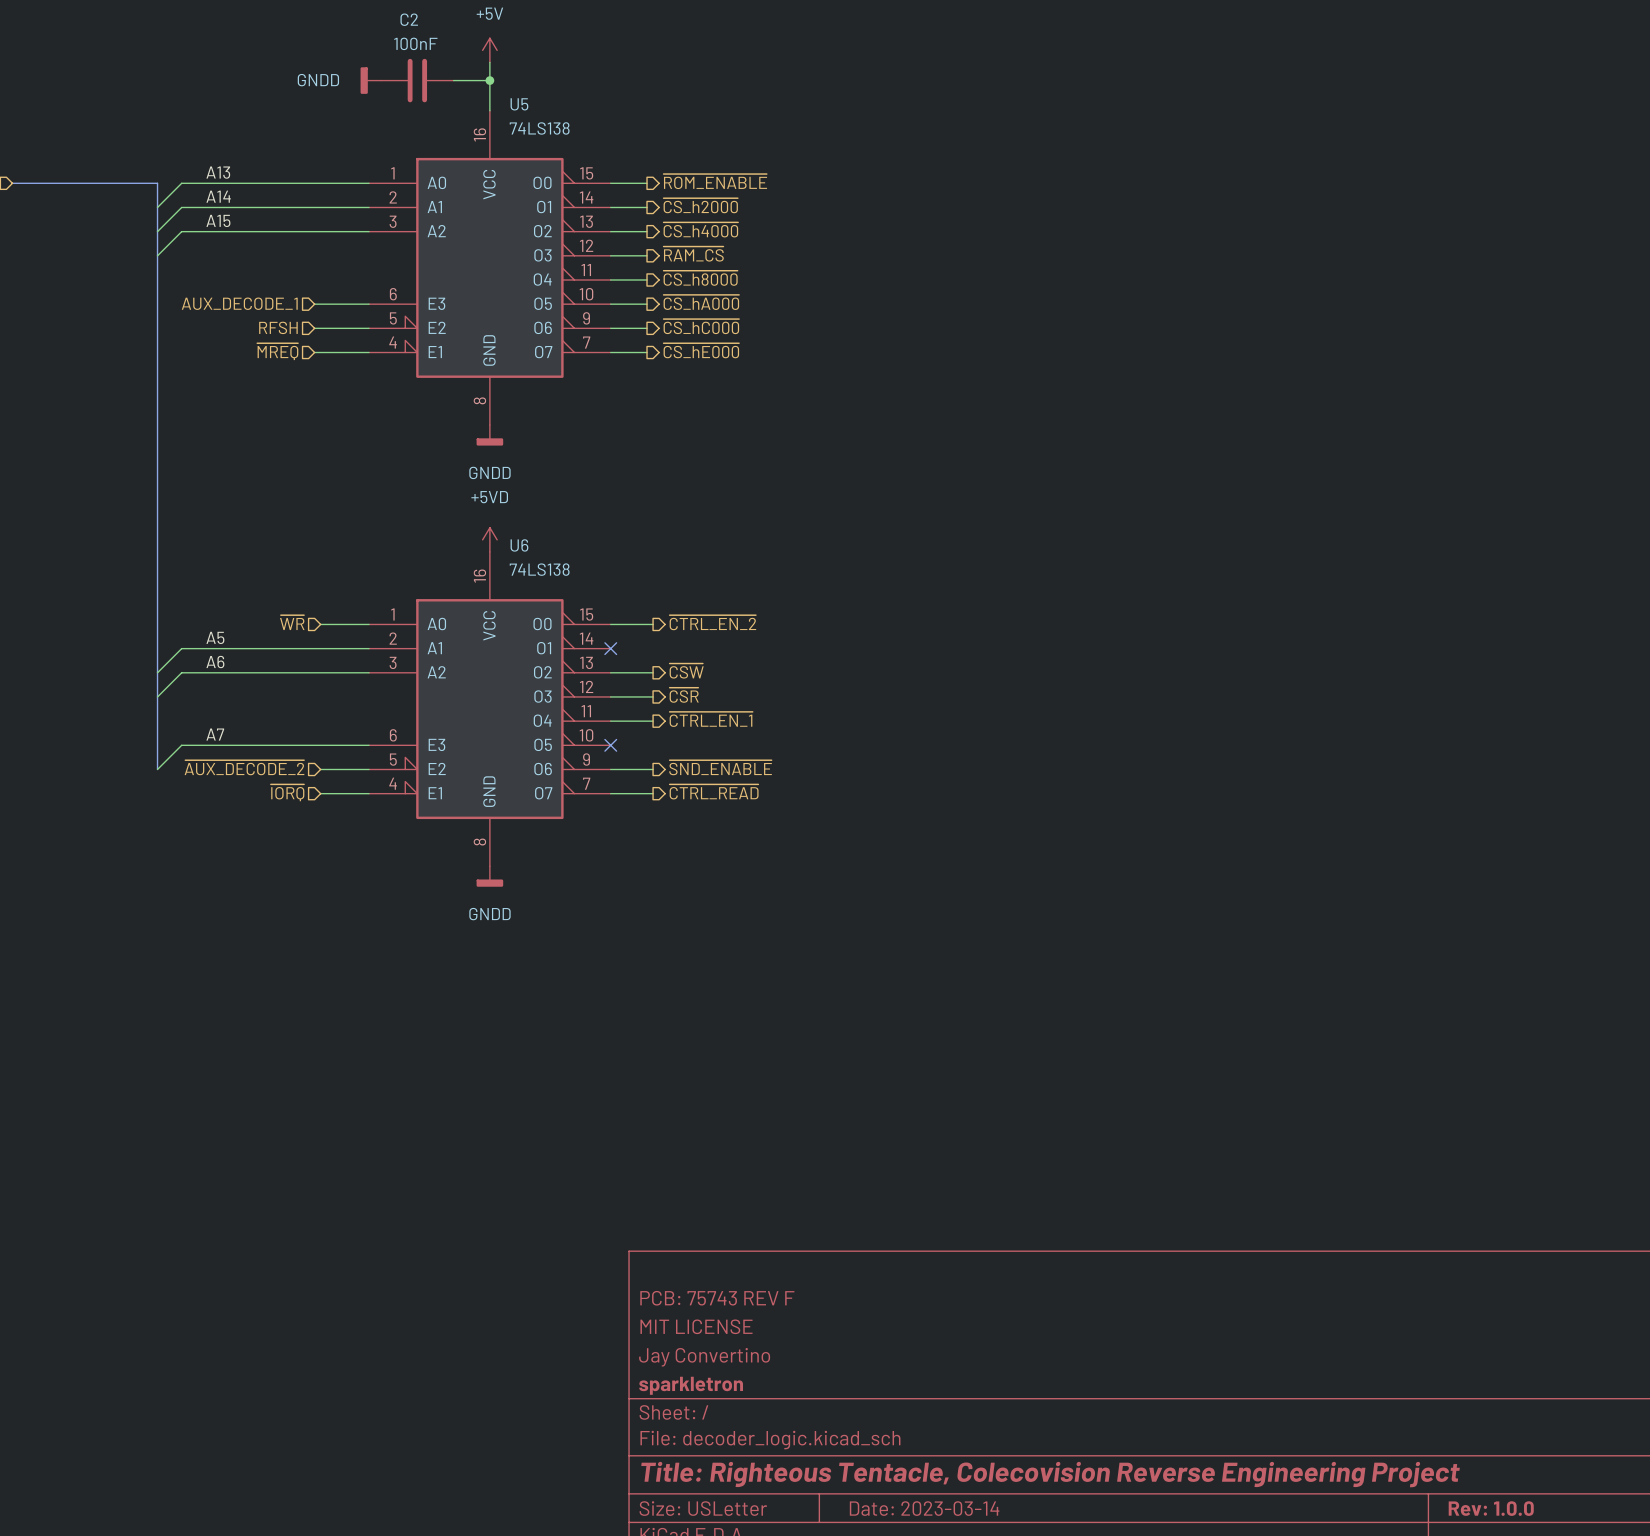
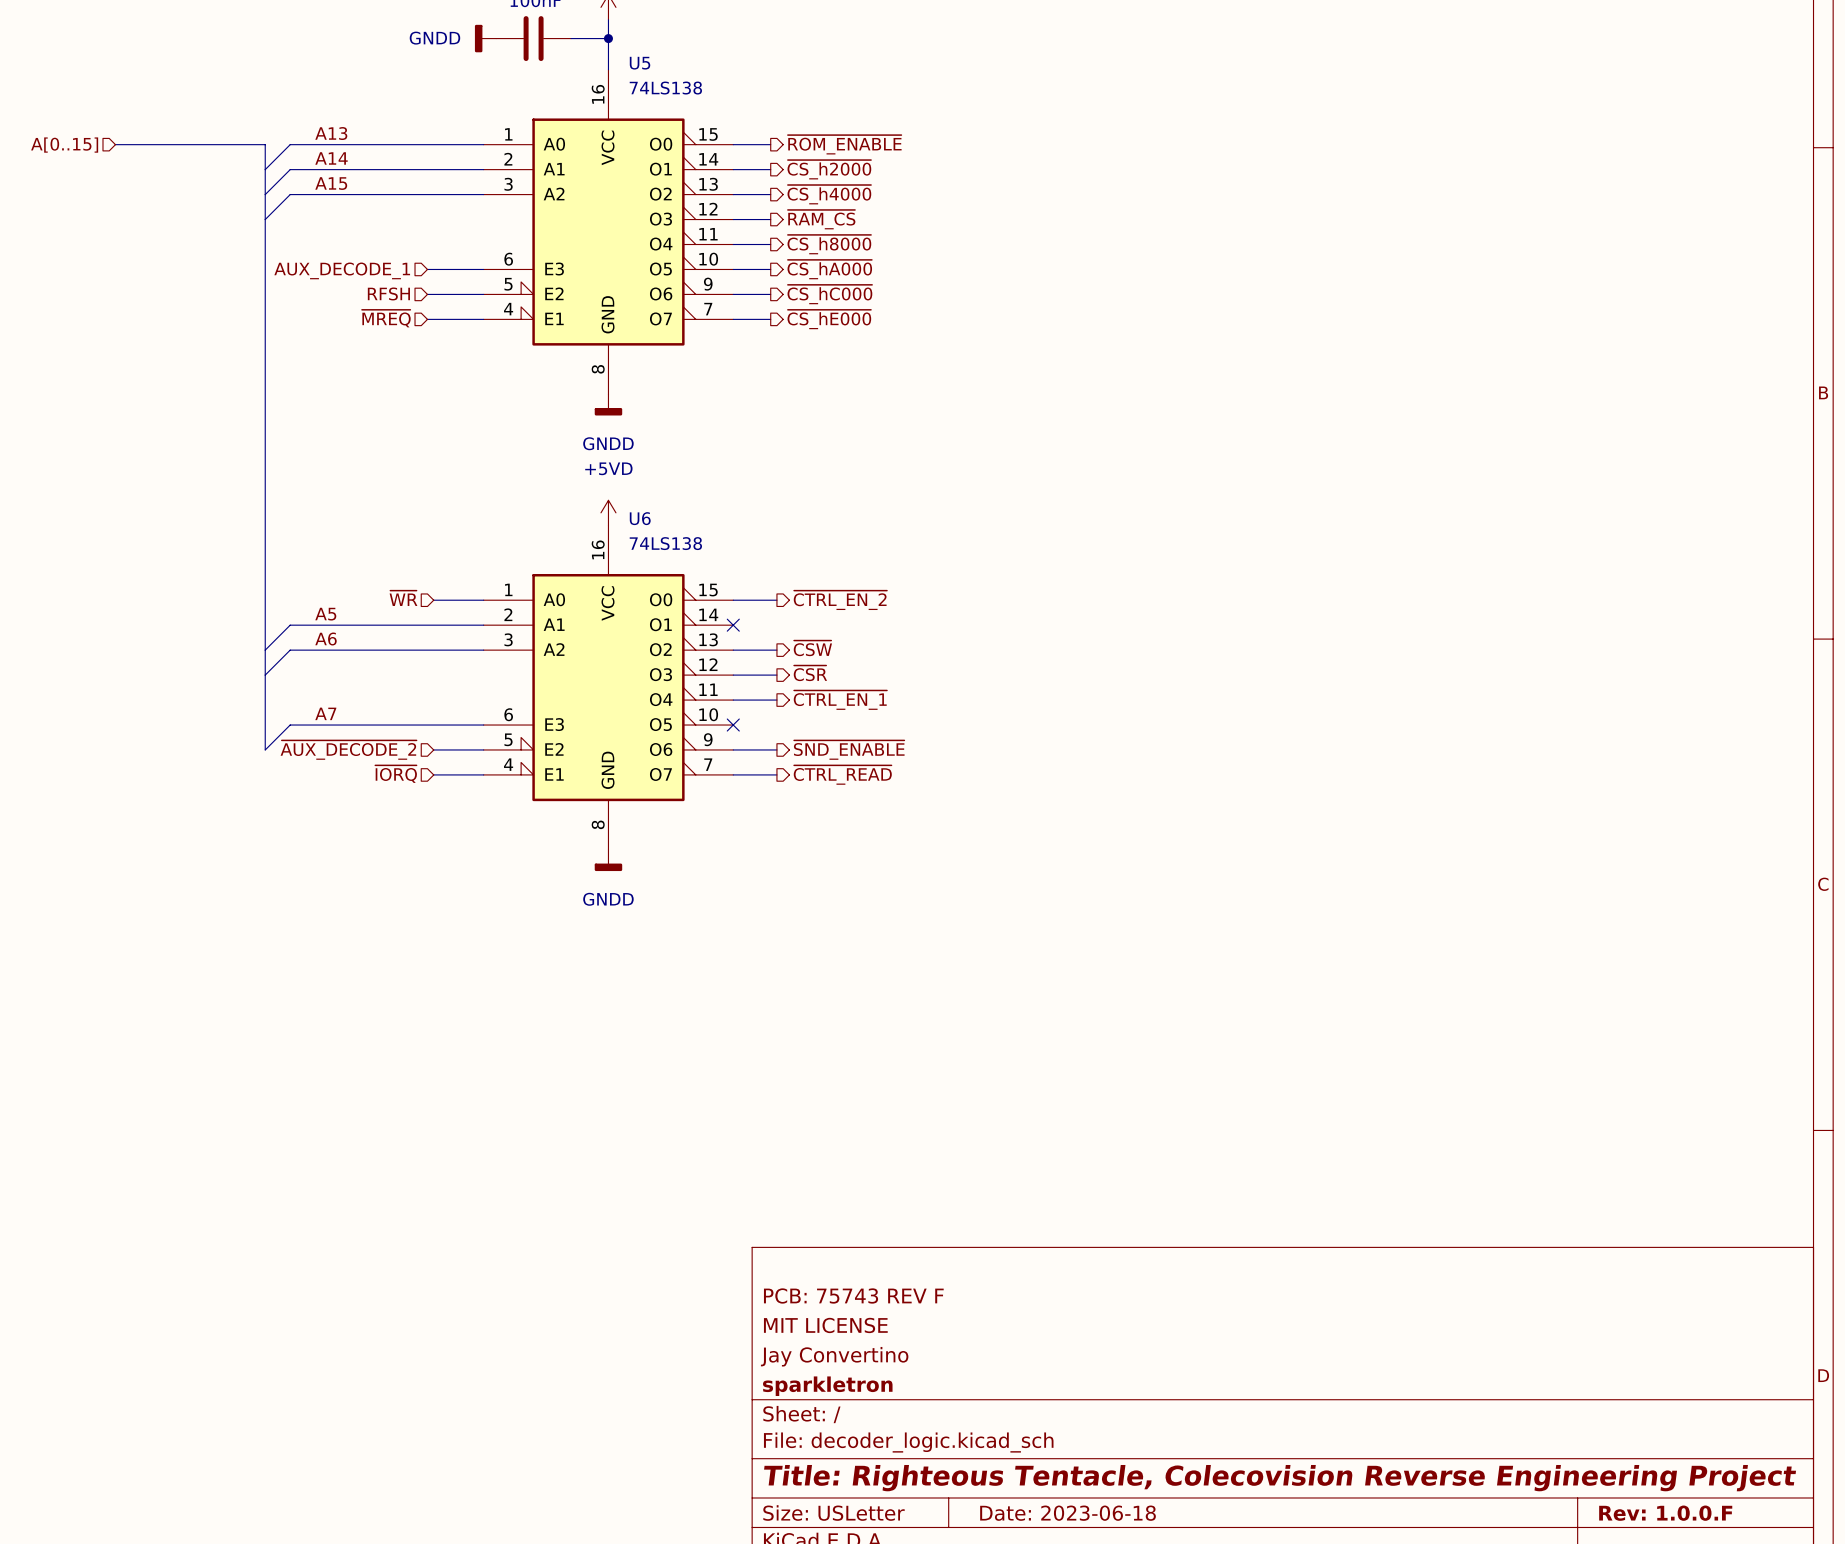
title block: Date: 2023-03-14 (924, 1508) -> Date: 2023-06-18 (1068, 1513)
title block: Rev: 1.0.0 (1491, 1508) -> Rev: 1.0.0.F (1665, 1513)

